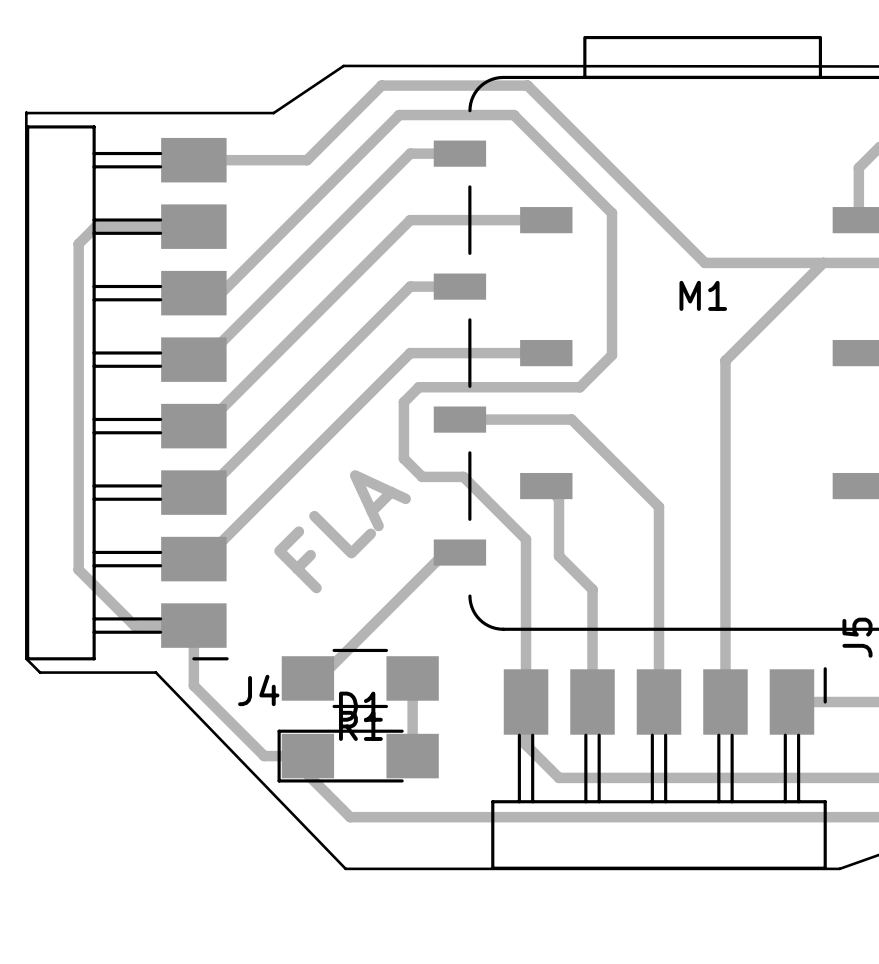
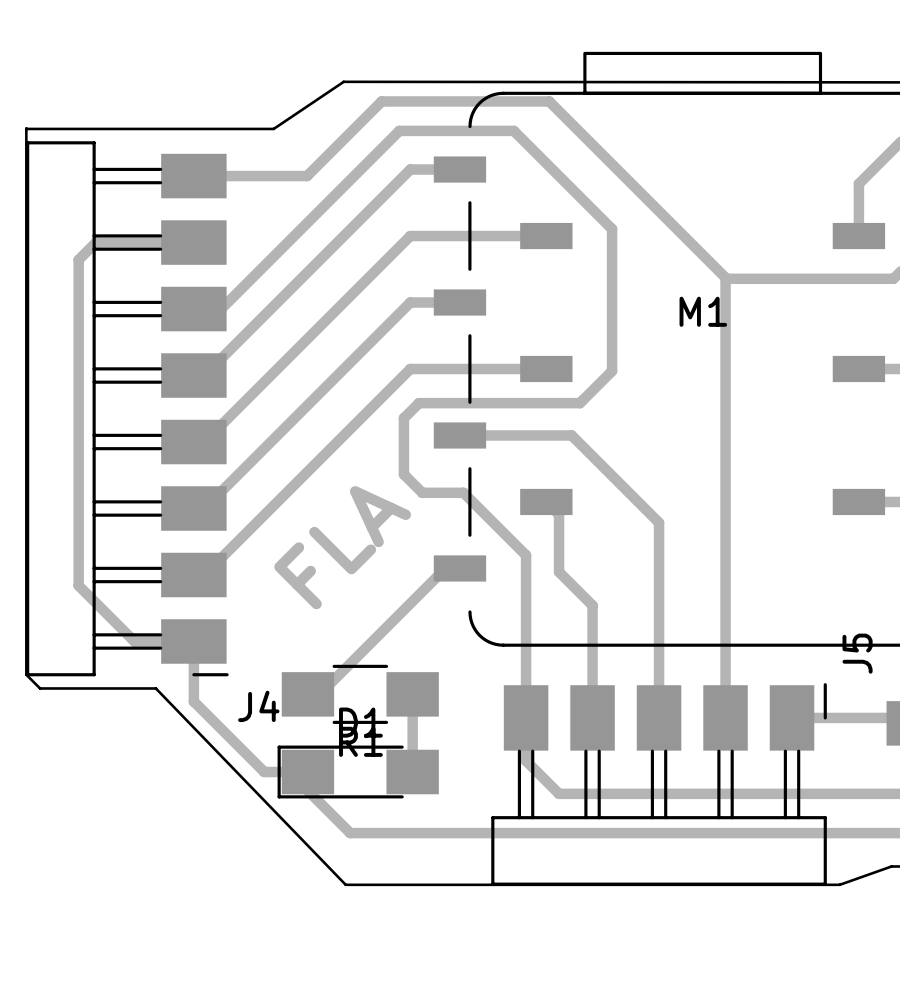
track: (527, 85) (704, 262) (726, 262) -> (527, 101) (549, 101) (725, 277) (725, 376)
track: (823, 262) (725, 360) -> none

